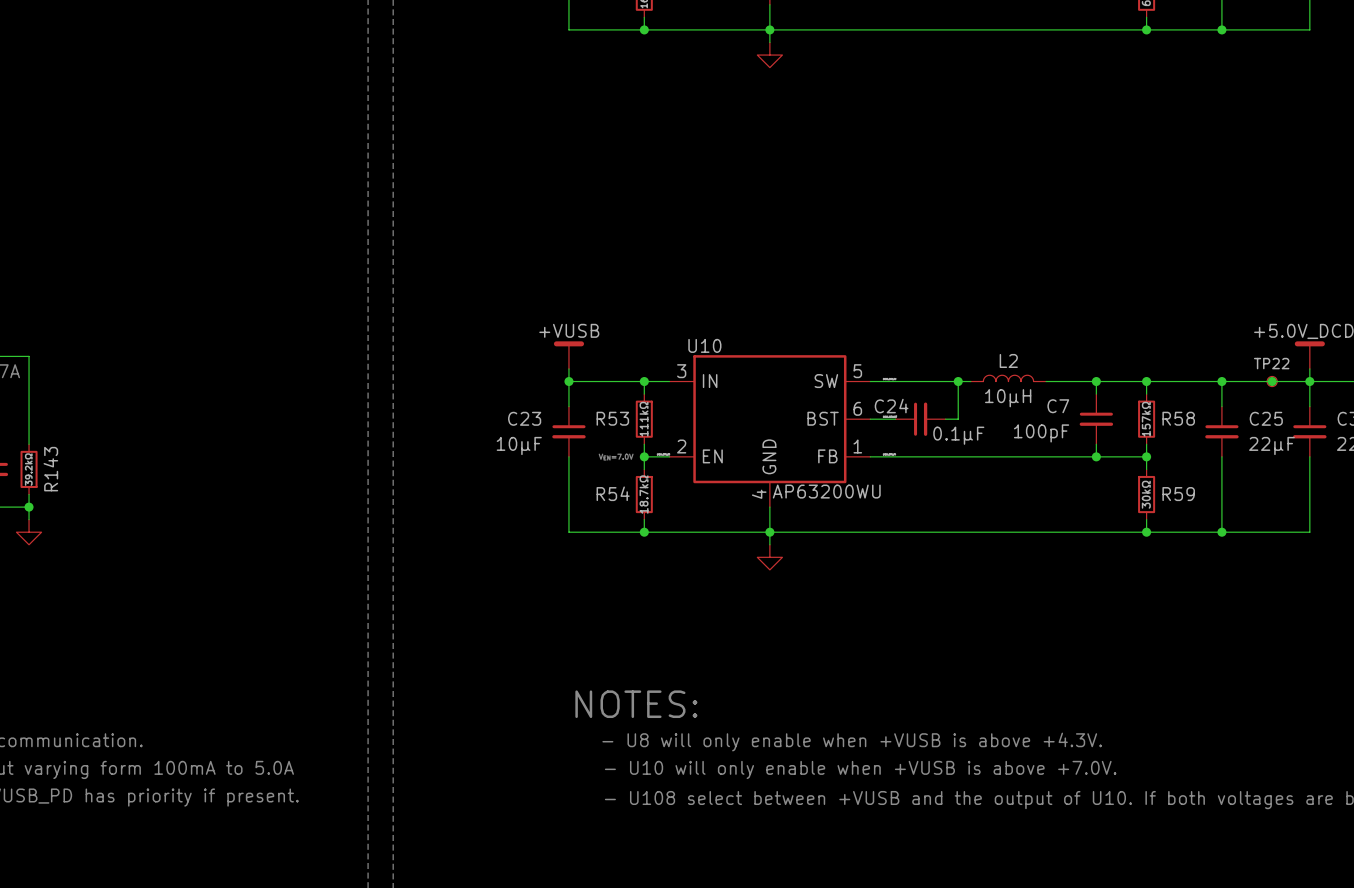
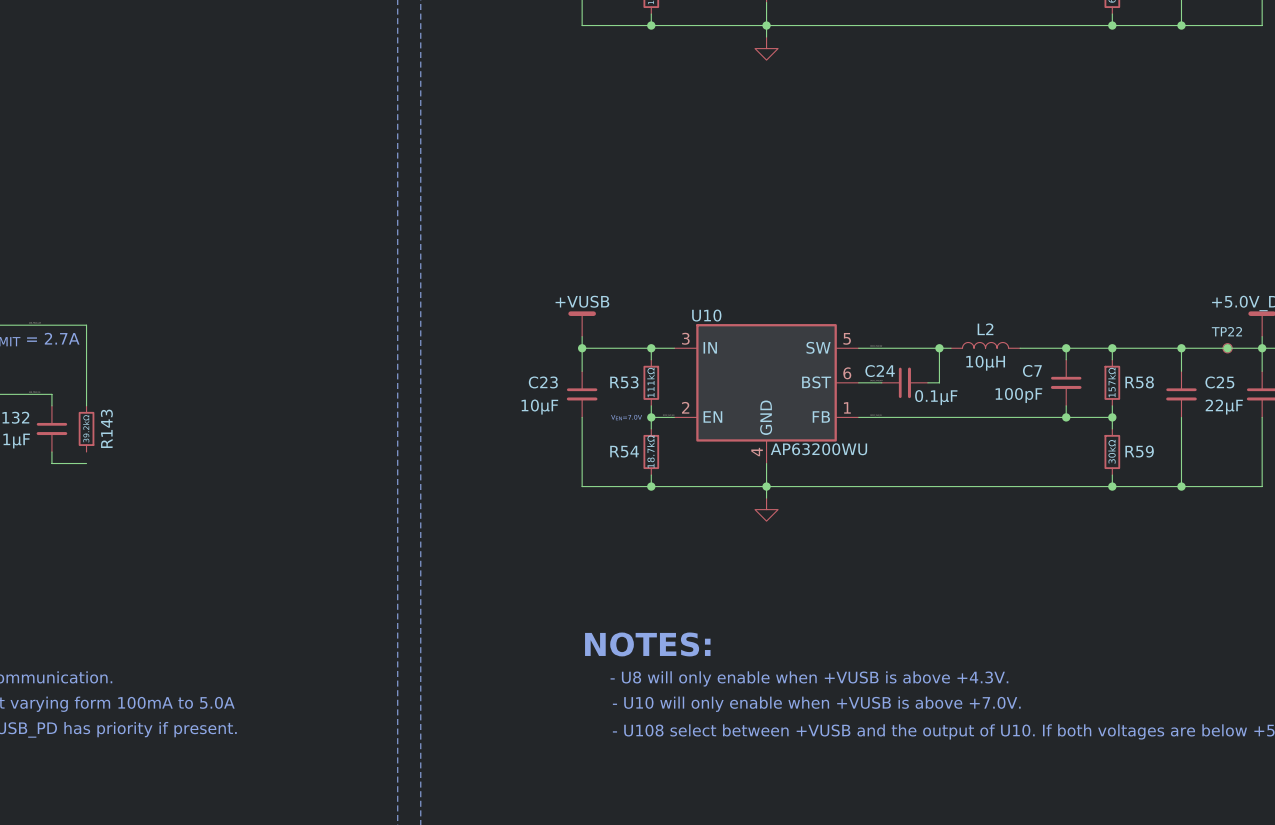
wire: (29, 494) (29, 519) -> none
junction: (29, 507) -> none
power symbol: (29, 532) -> none

